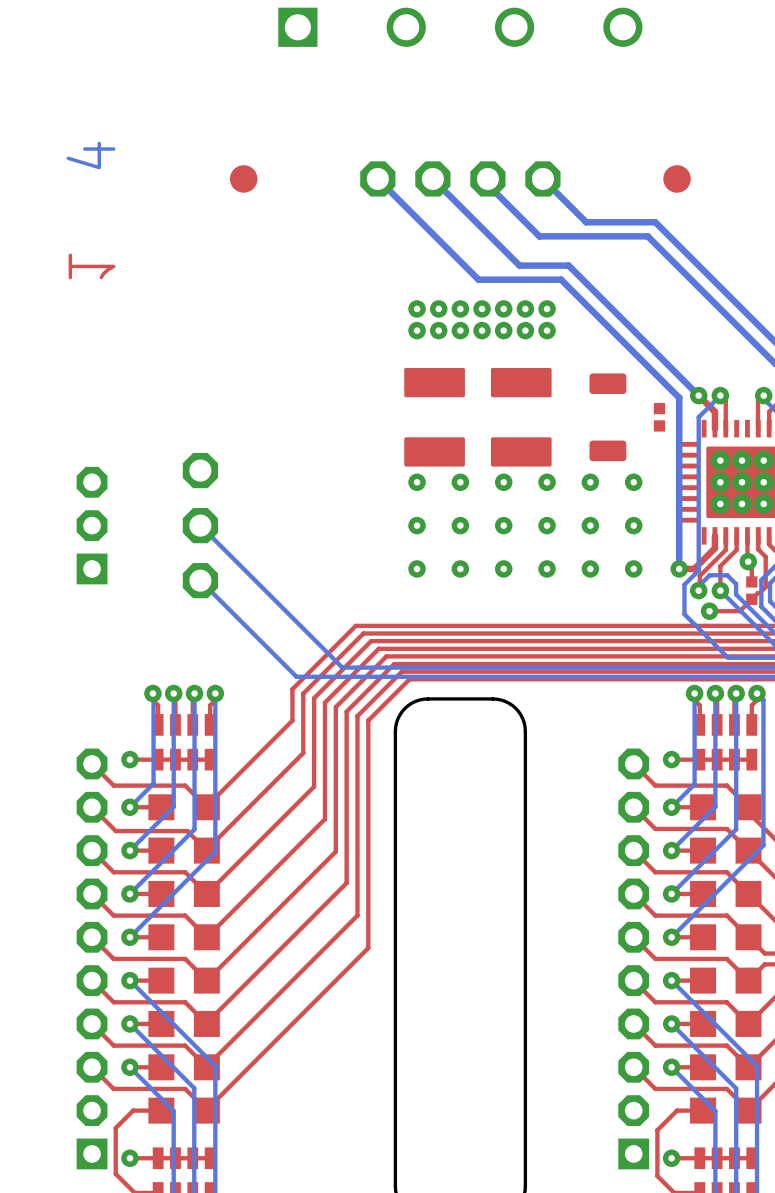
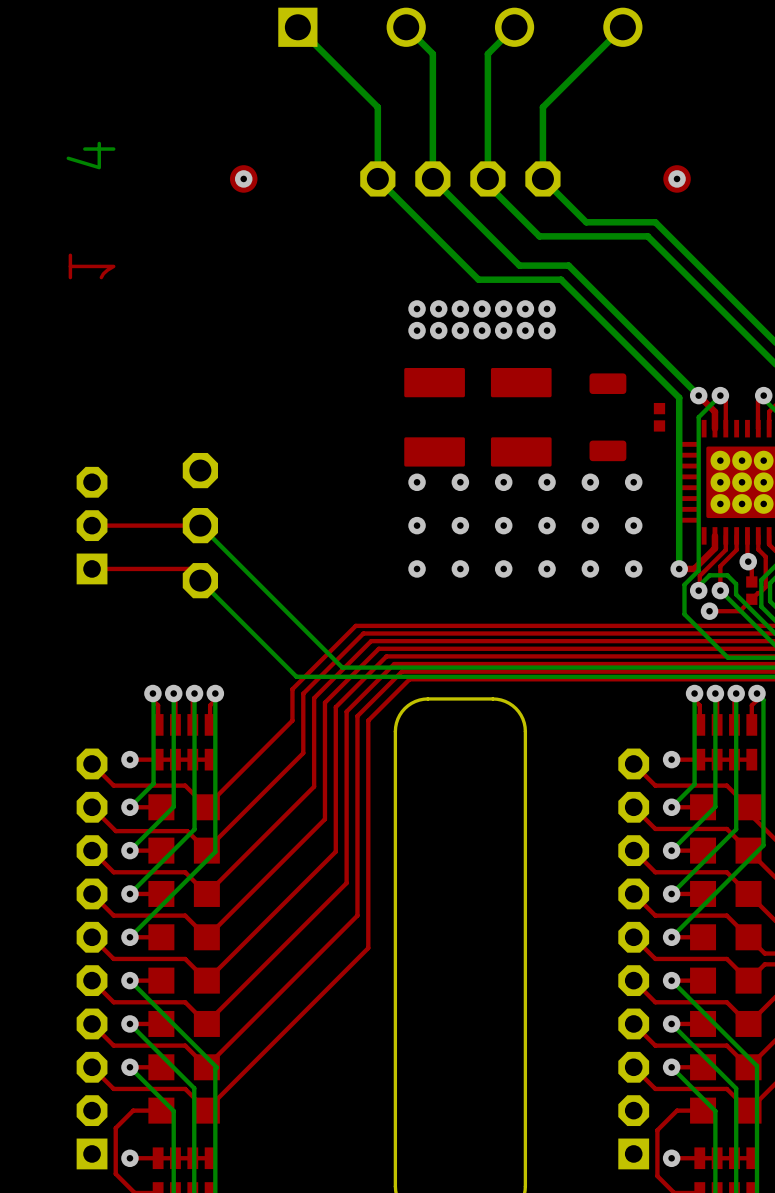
bottom track: none -> (297, 27) (377, 107) (377, 178)
bottom track: none -> (406, 27) (432, 53) (432, 178)
bottom track: none -> (514, 27) (487, 53) (487, 178)
bottom track: none -> (622, 27) (542, 107) (542, 178)
via: none -> (243, 178)
via: none -> (677, 178)
top track: none -> (200, 525) (92, 525)
top track: none -> (92, 568) (188, 568) (200, 580)

